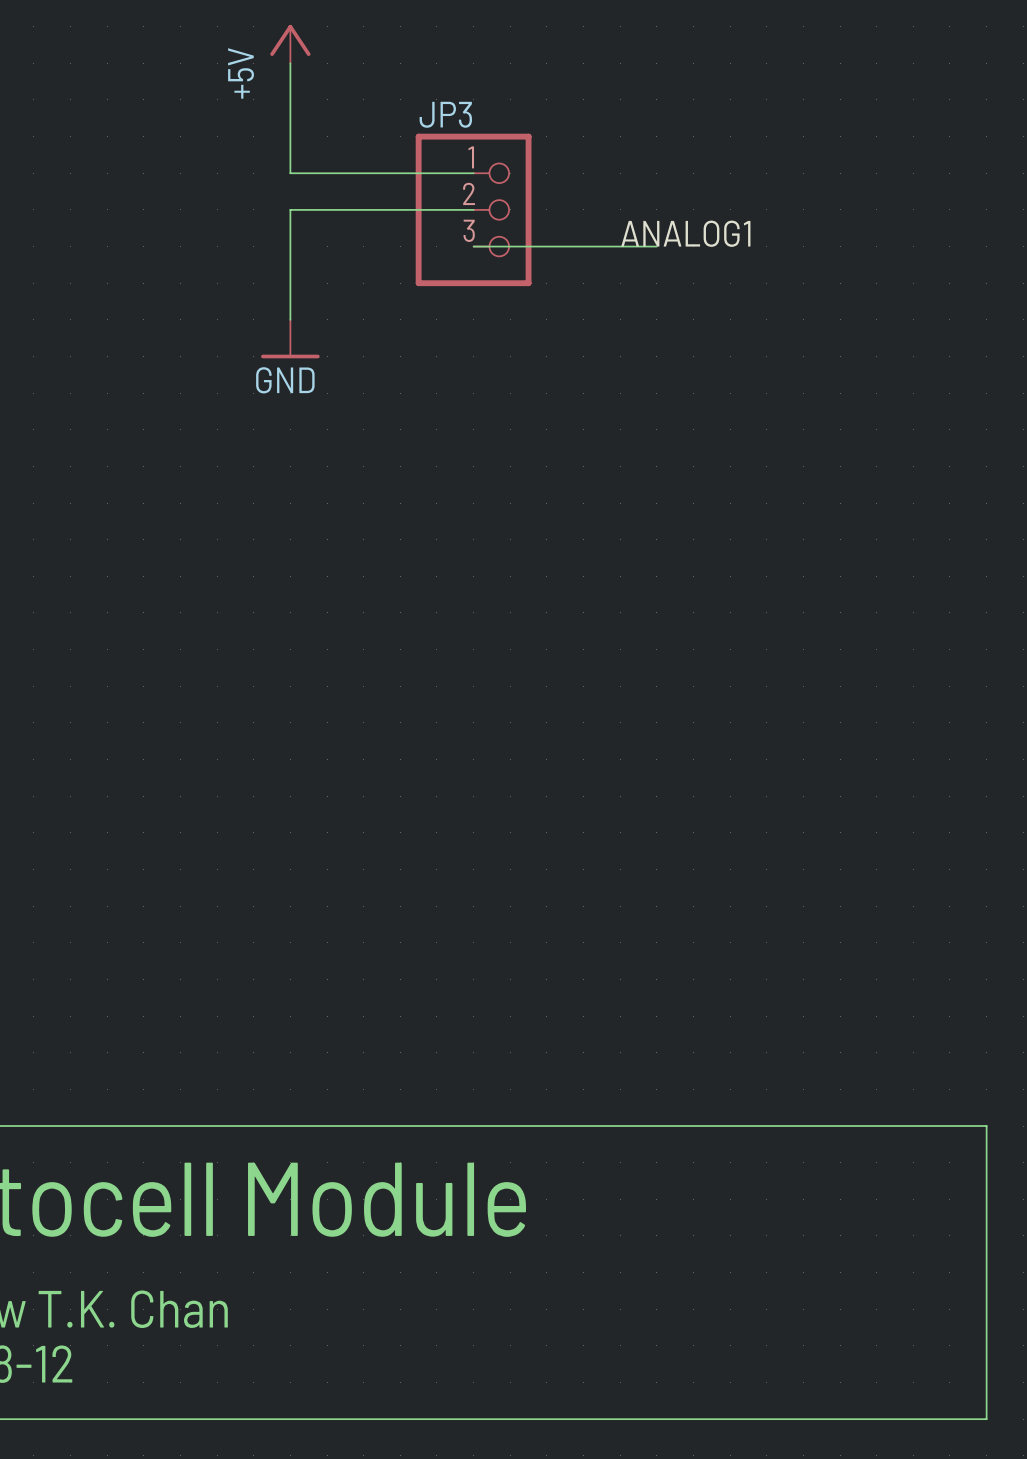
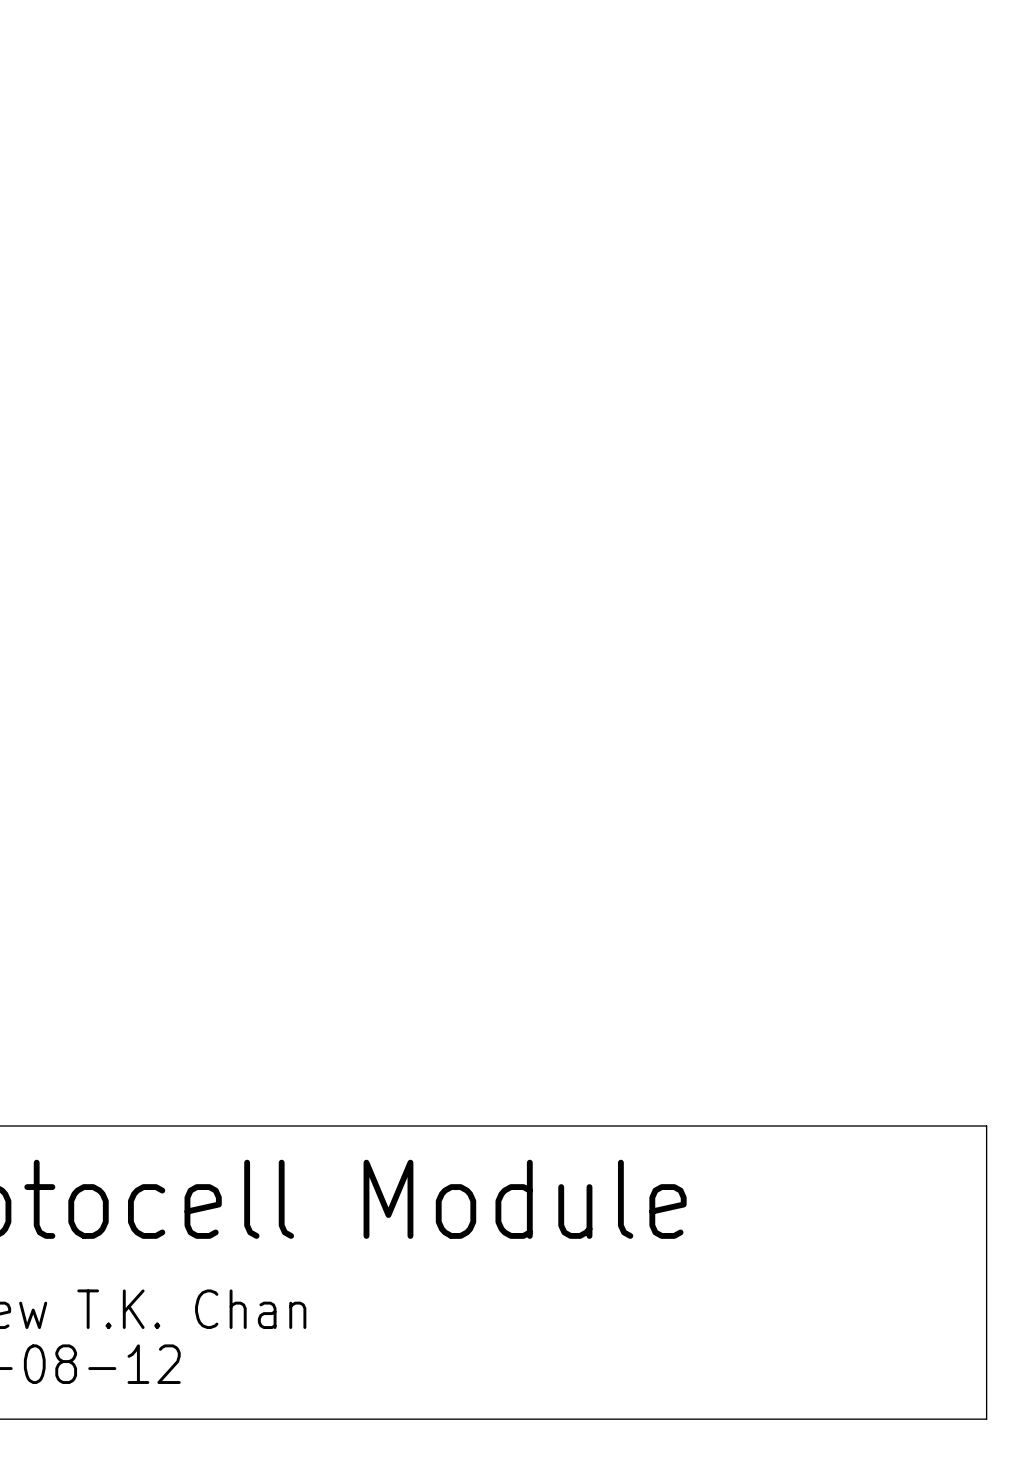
power symbol: +5V (290, 44) -> none
wire: (290, 63) (290, 173) (473, 173) -> none
wire: (473, 209) (290, 209) (290, 319) -> none
JP3: (473, 209) -> none
label: ANALOG1 (685, 233) -> none
wire: (473, 246) (656, 246) -> none
power symbol: GND (290, 339) -> none

